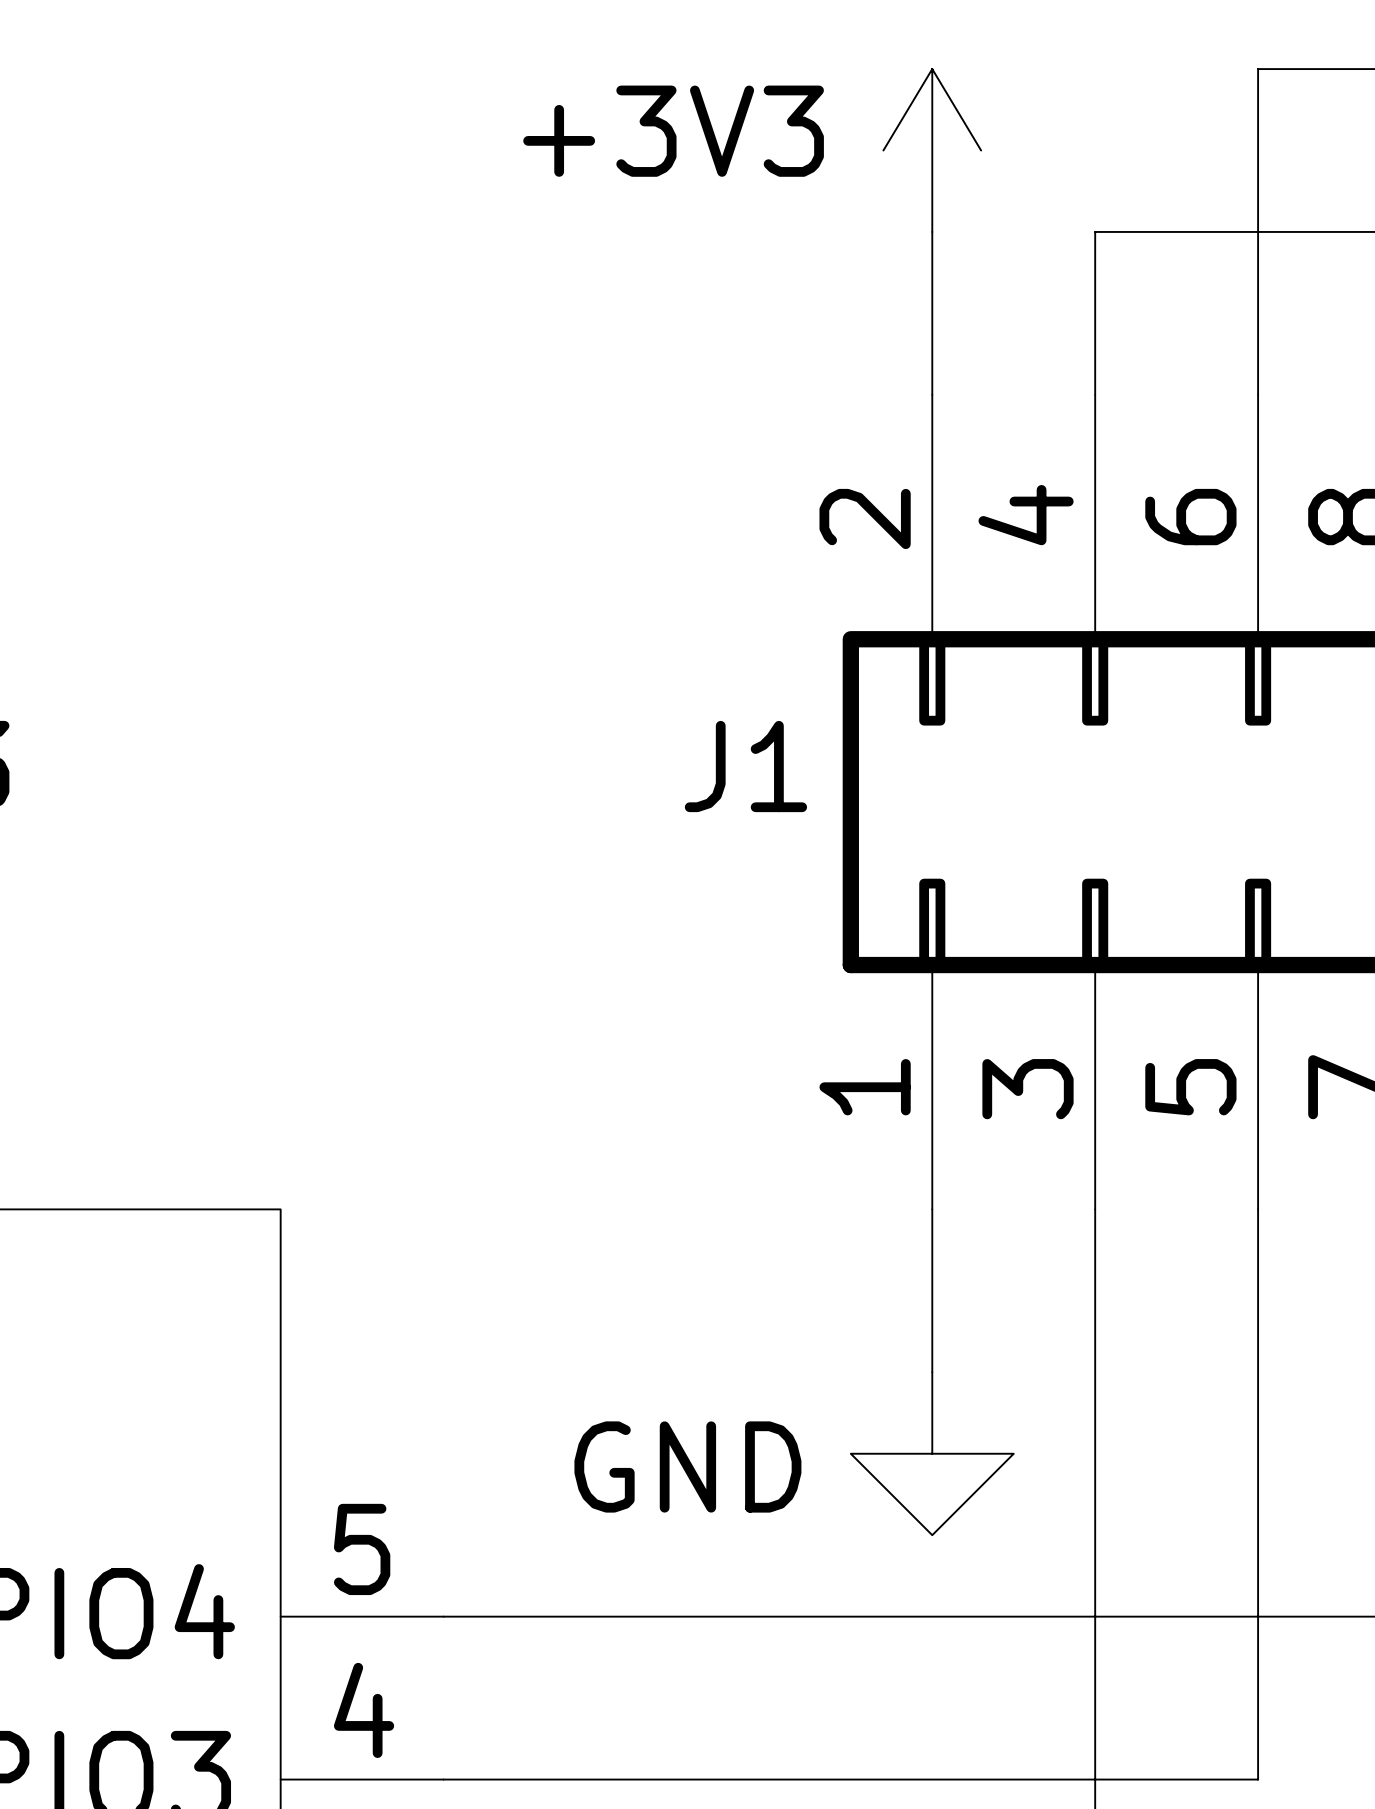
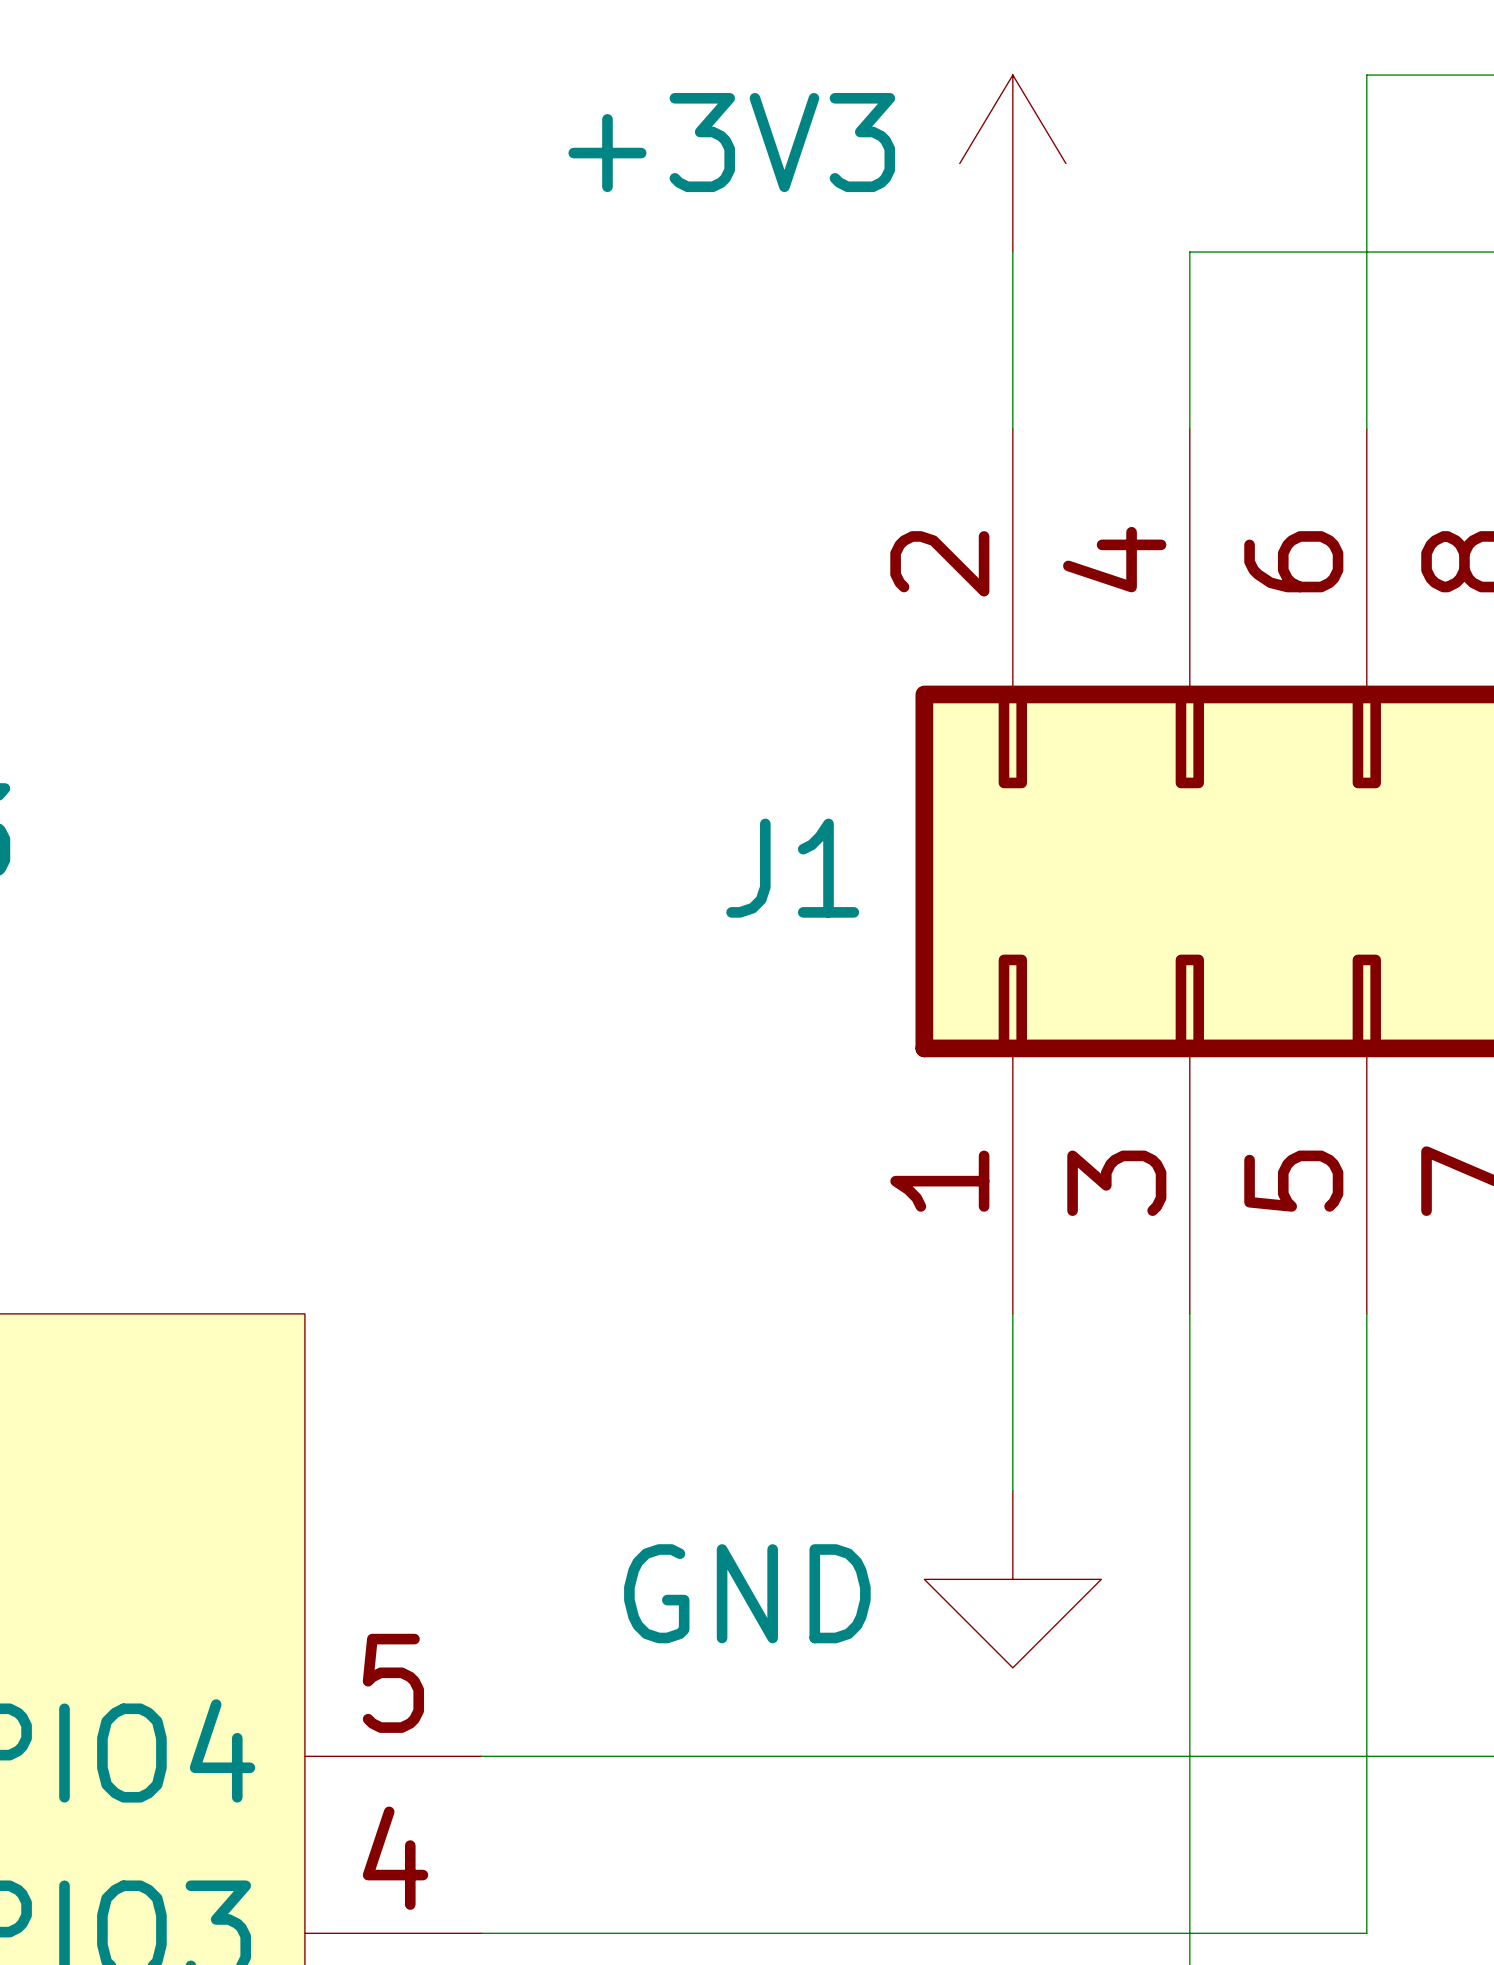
J1 name position: J1 (745, 766) -> J1 (792, 868)

